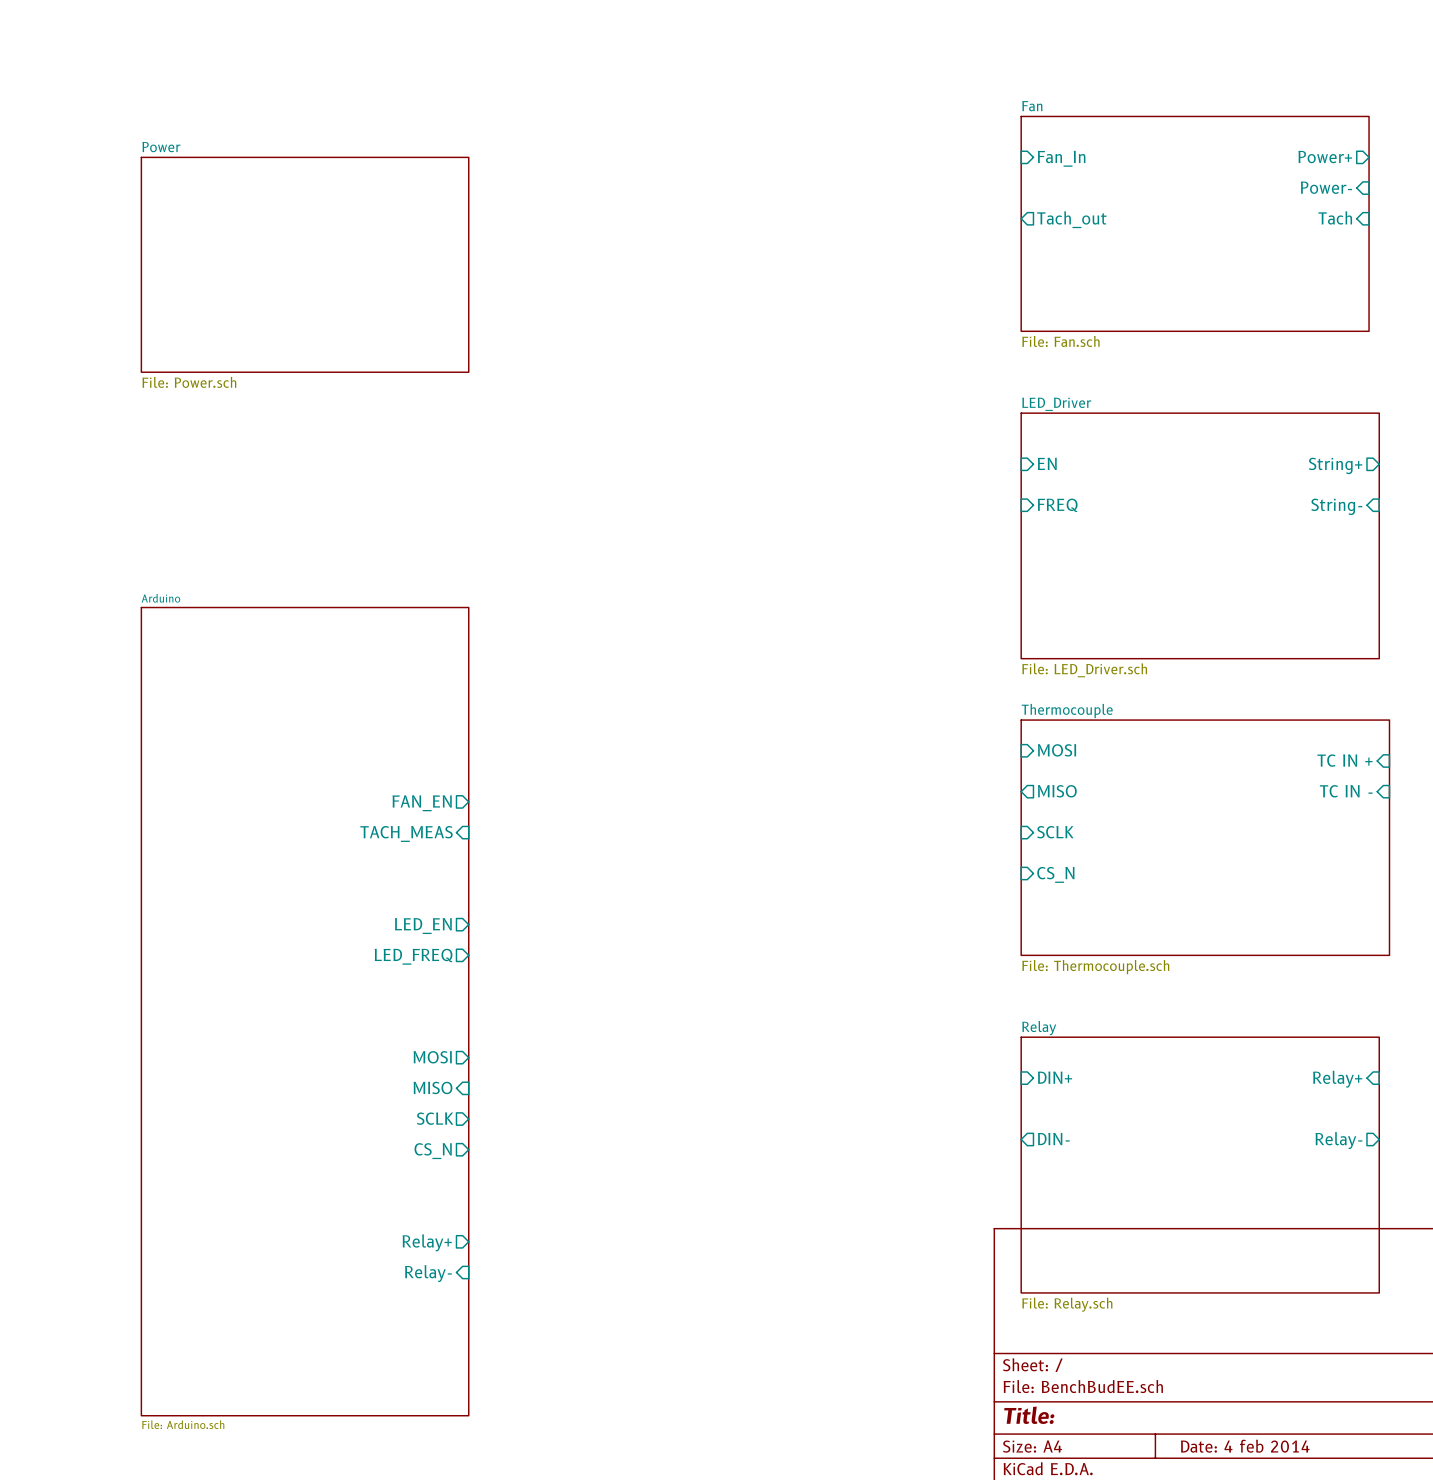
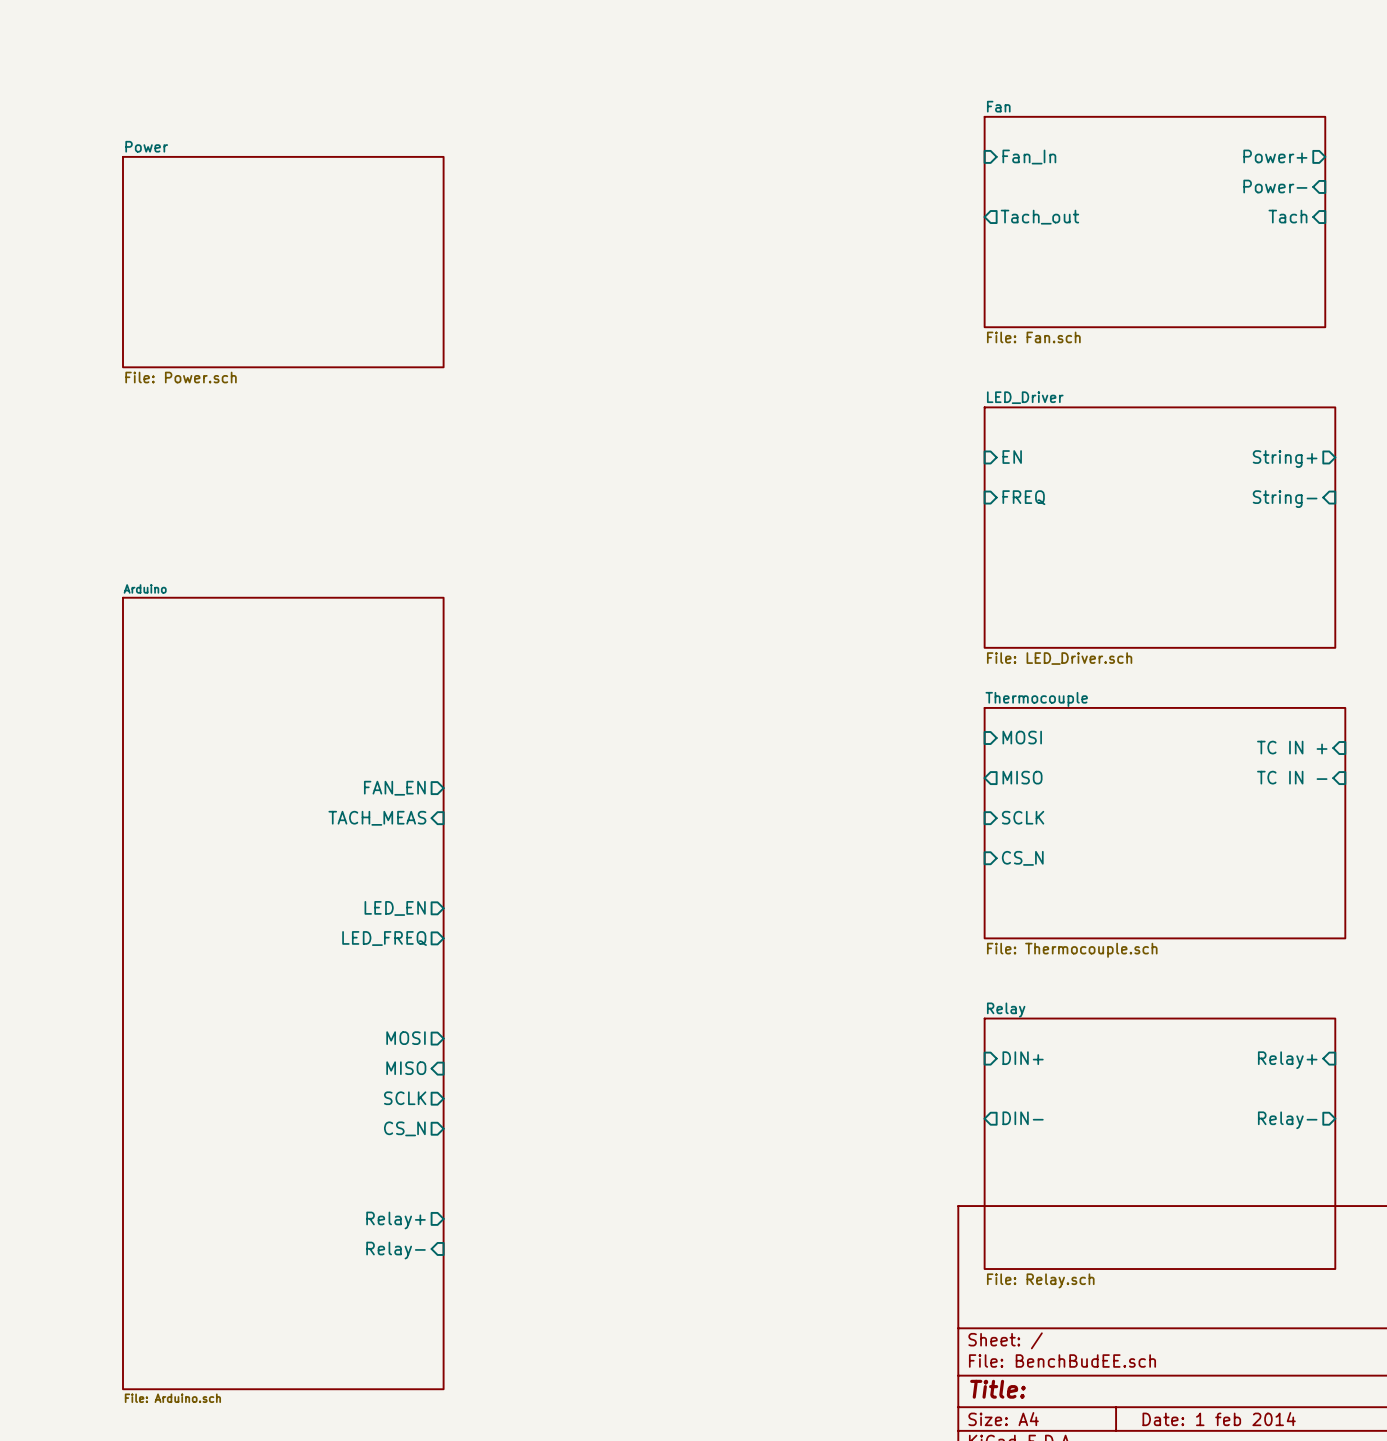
title block: Date: 4 feb 2014 (1245, 1446) -> Date: 1 feb 2014 (1219, 1419)

